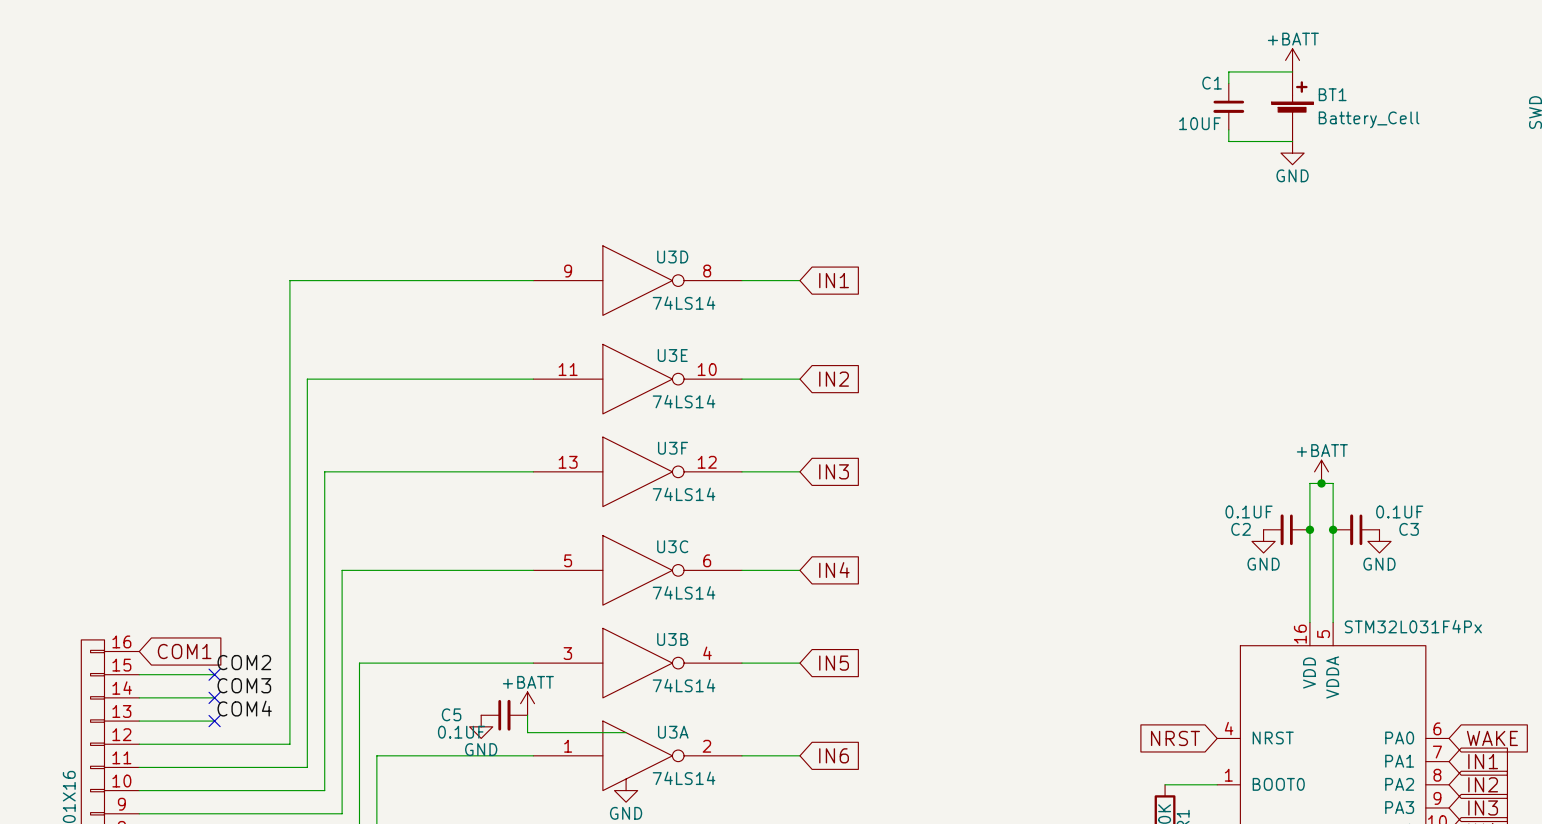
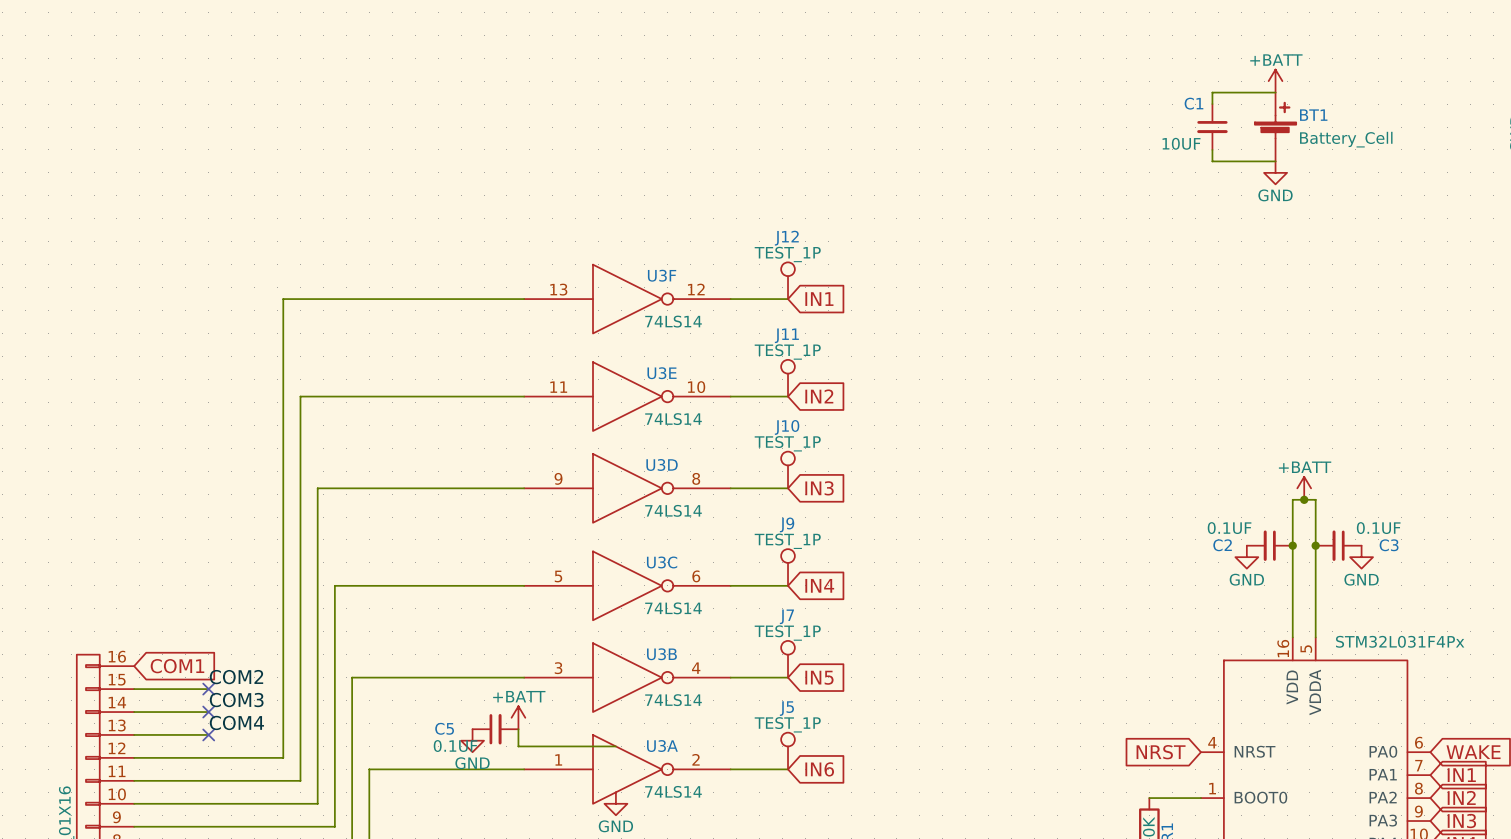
J12: none -> TEST_1P (788, 280)
U3D position: (637, 280) -> (627, 488)
J11: none -> TEST_1P (788, 378)
J10: none -> TEST_1P (788, 469)
U3F position: (637, 471) -> (627, 299)
J9: none -> TEST_1P (788, 567)
J7: none -> TEST_1P (788, 659)
J5: none -> TEST_1P (788, 751)

